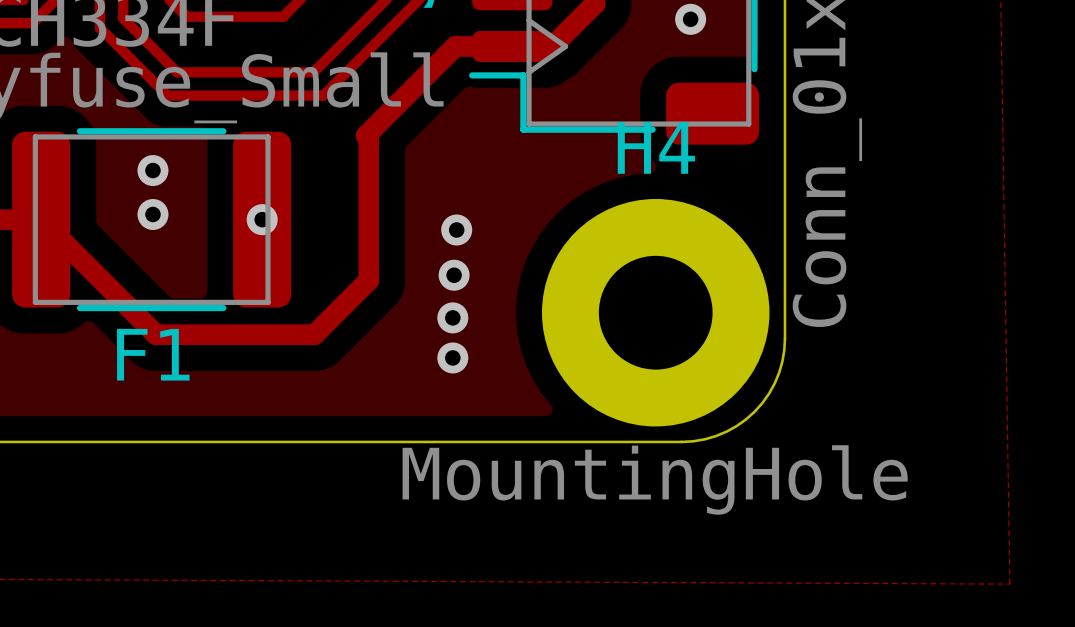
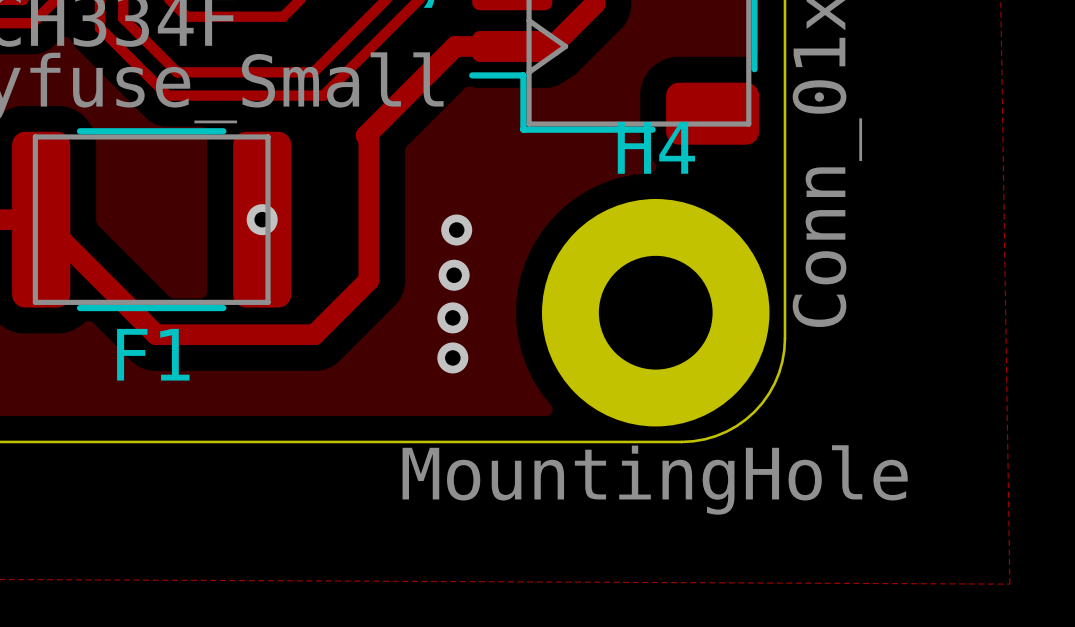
via: (690, 19) -> none
via: (152, 170) -> none
via: (152, 214) -> none

